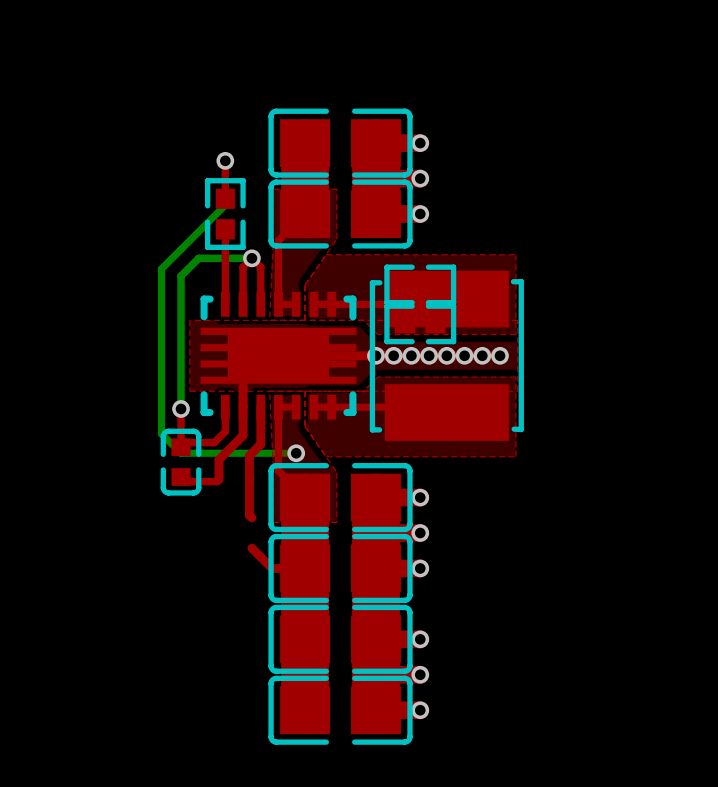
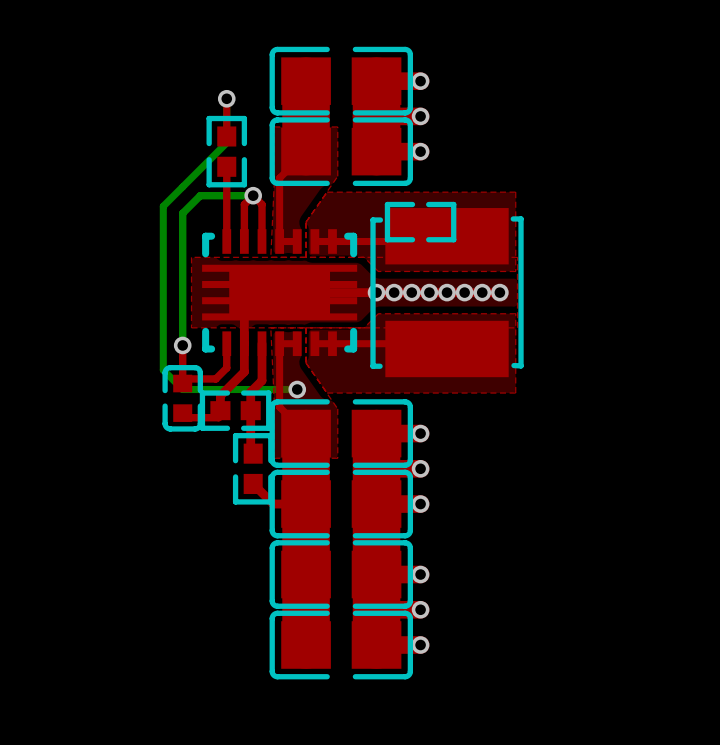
part: (420, 323) -> none
part: none -> (235, 410)
part: none -> (253, 468)

